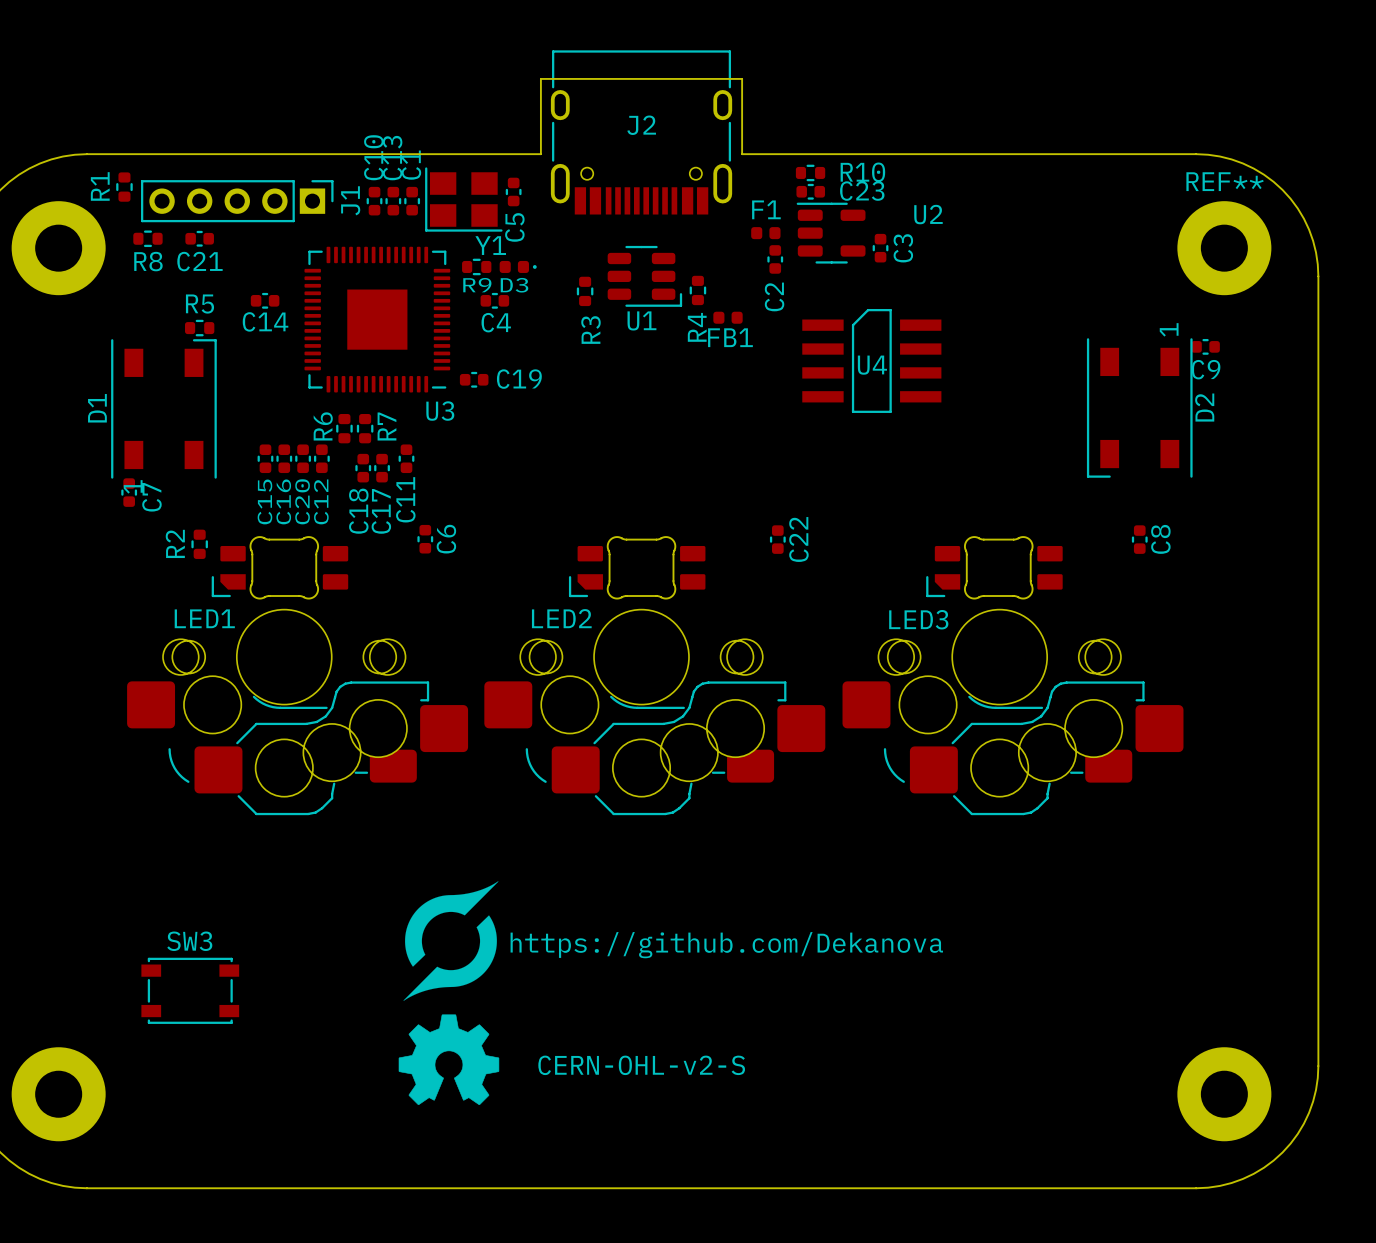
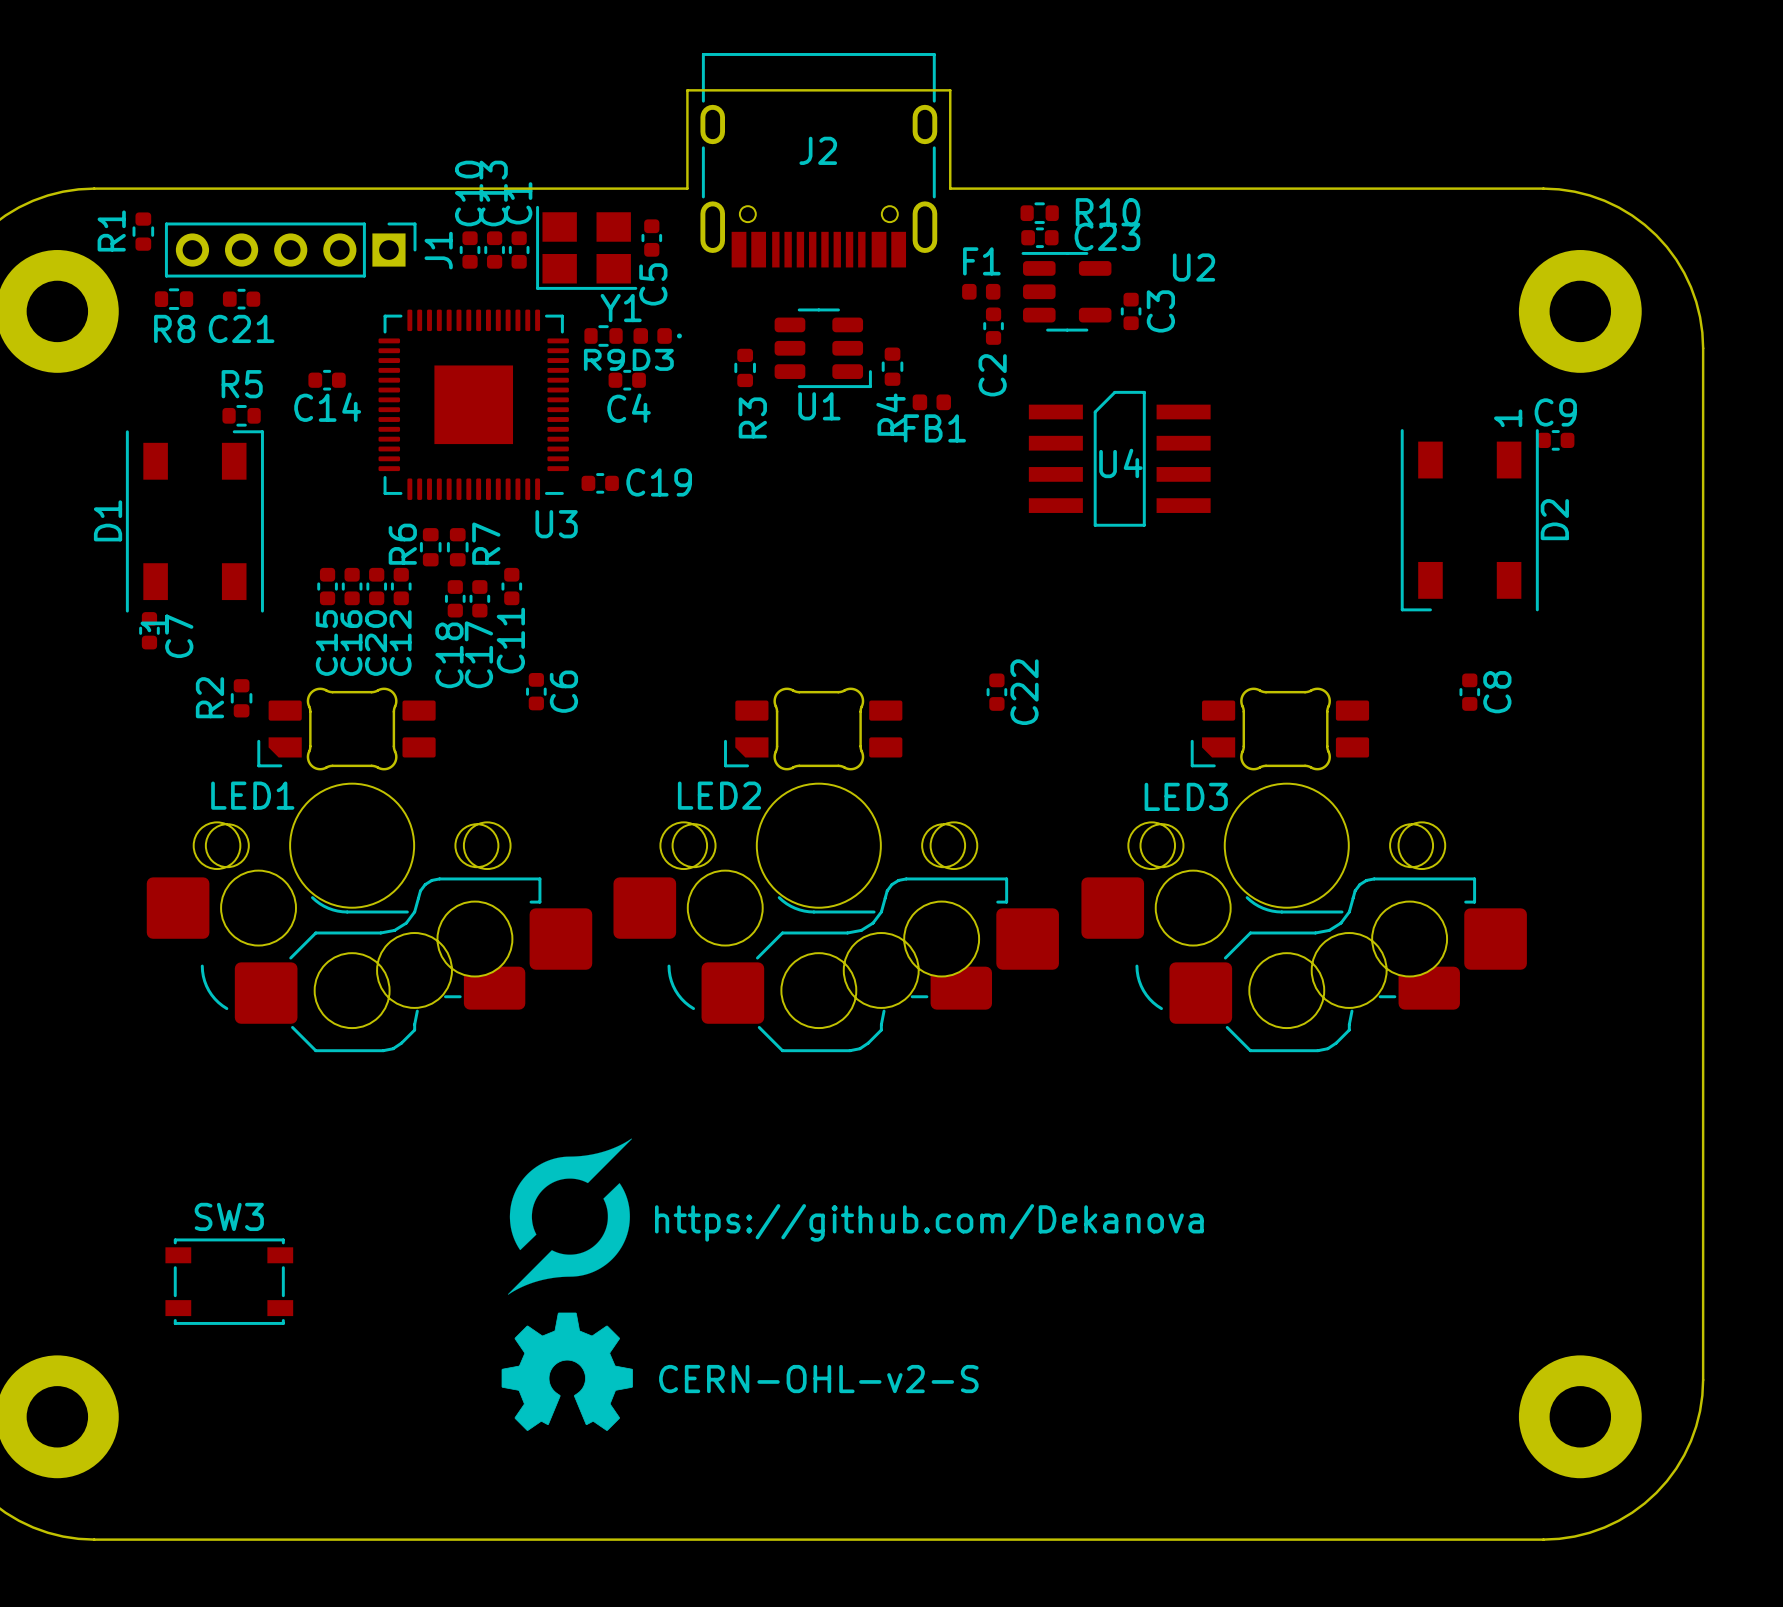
REF** name: REF** (1225, 181) -> none
C9 name position: C9 (1206, 369) -> C9 (1555, 412)

